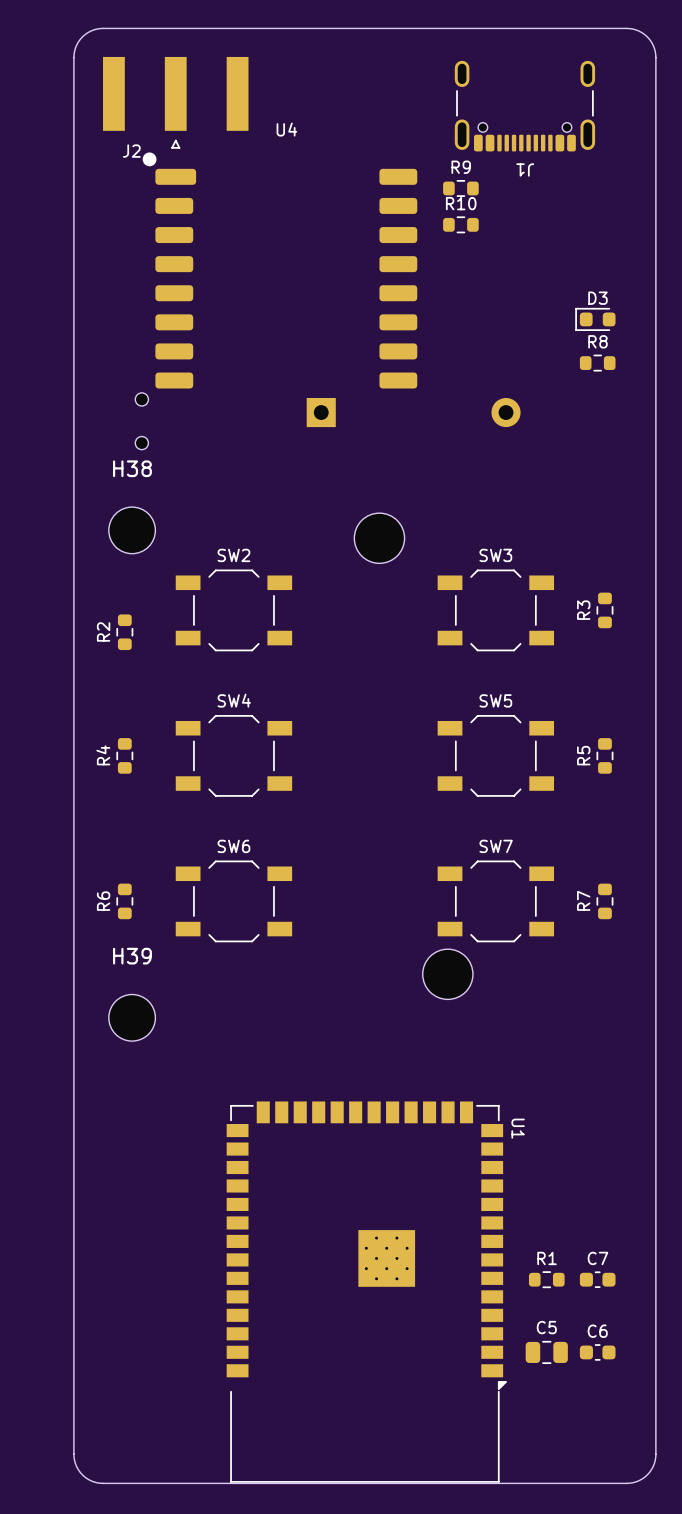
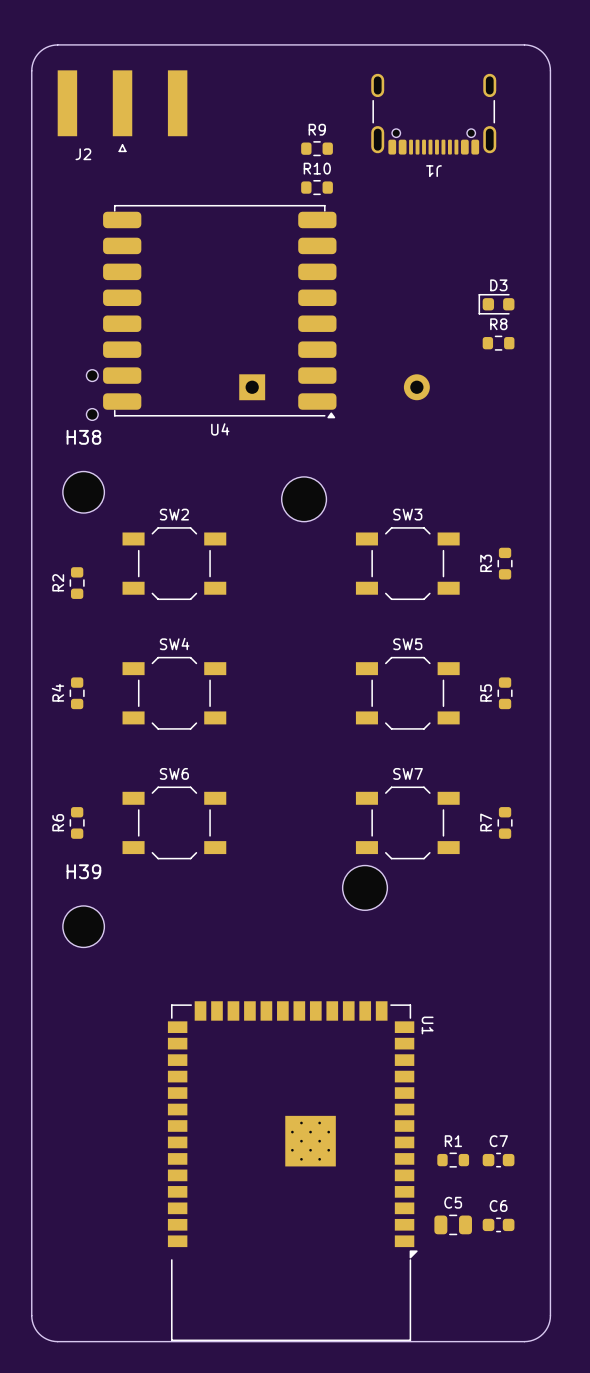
U4 name position: U4 (286, 129) -> U4 (220, 429)
U4 footprint: [142, 152, 418, 389] -> [103, 204, 337, 419]
R9 position: (460, 188) -> (317, 148)
R10 position: (460, 224) -> (317, 187)

